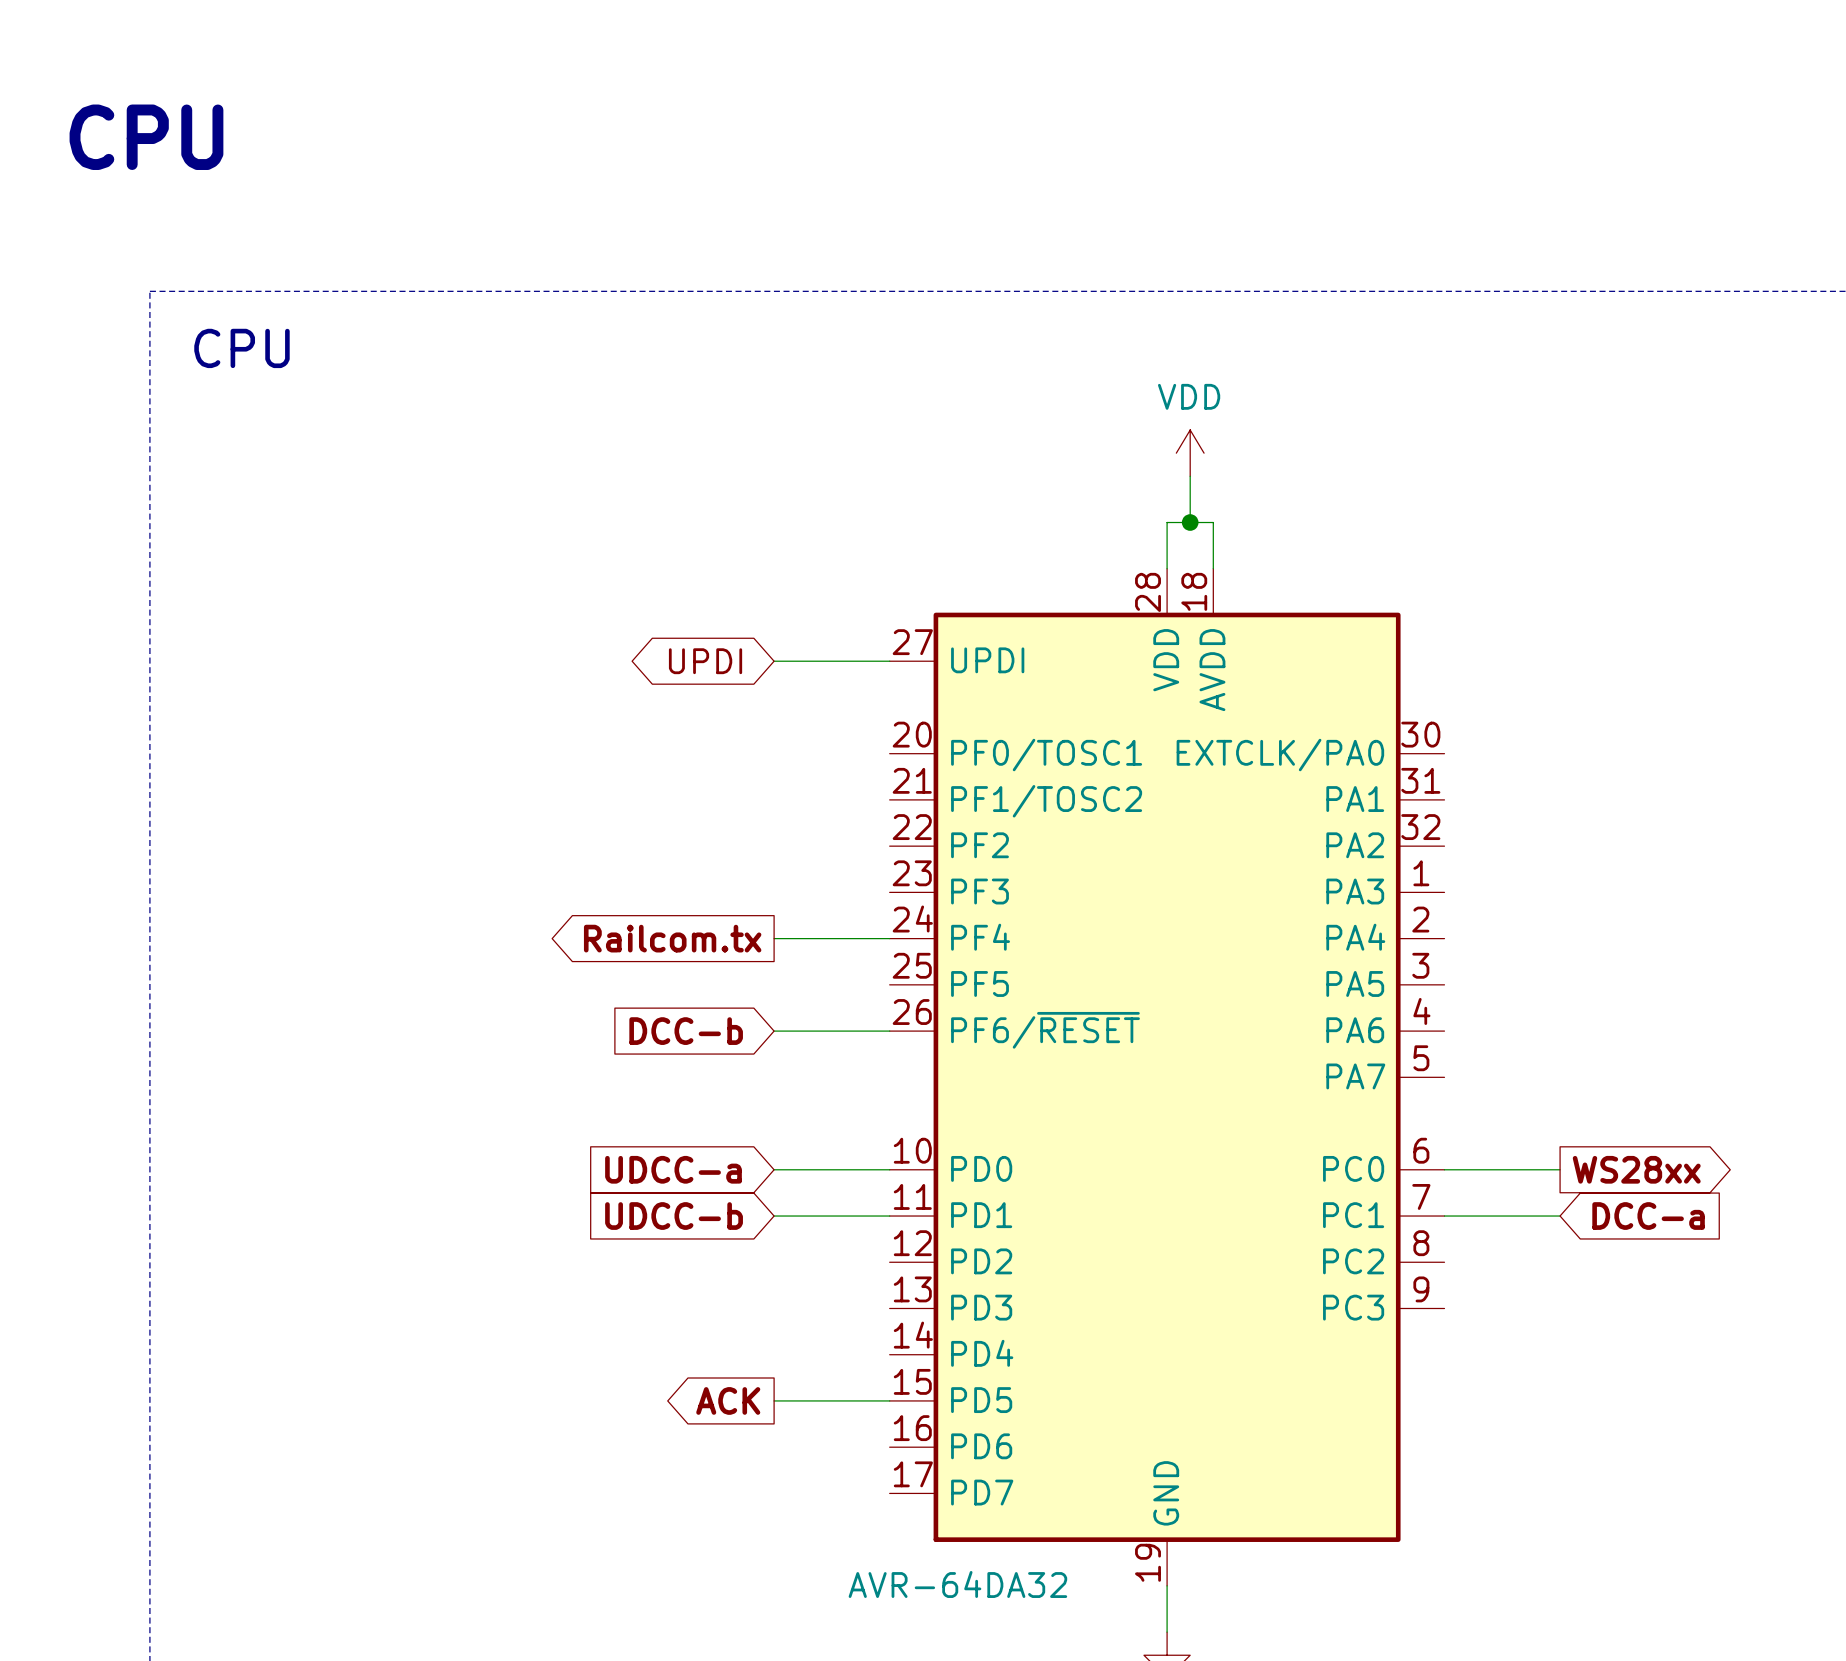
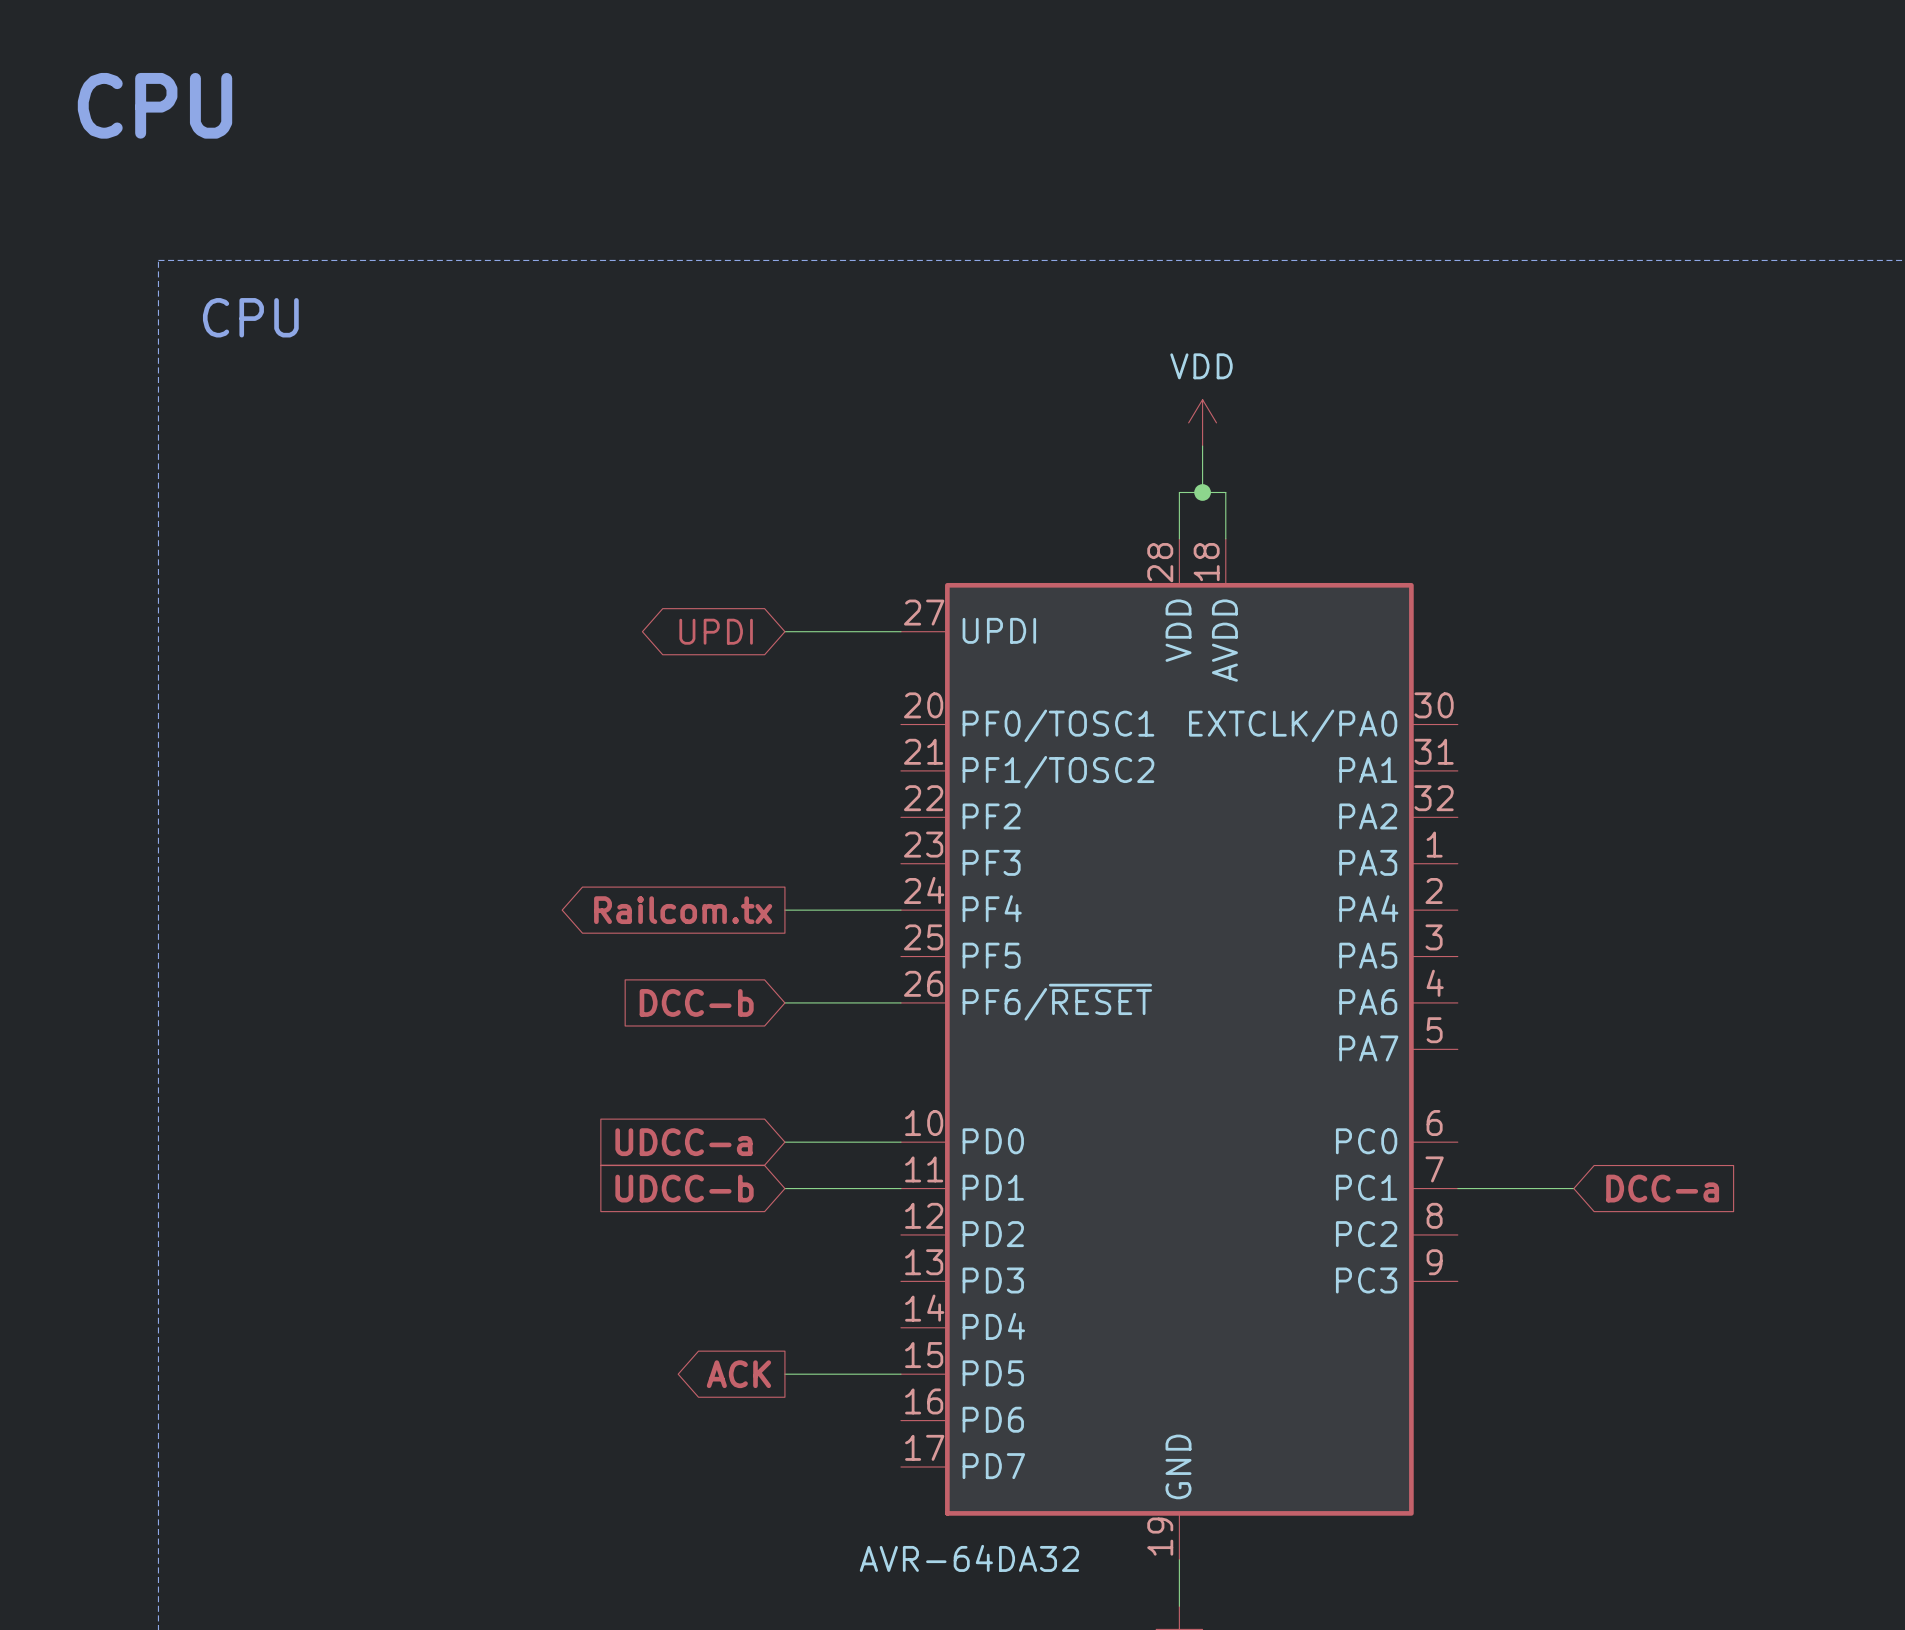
wire: (1444, 1169) (1560, 1169) -> none
global label: WS28xx (1636, 1169) -> none

